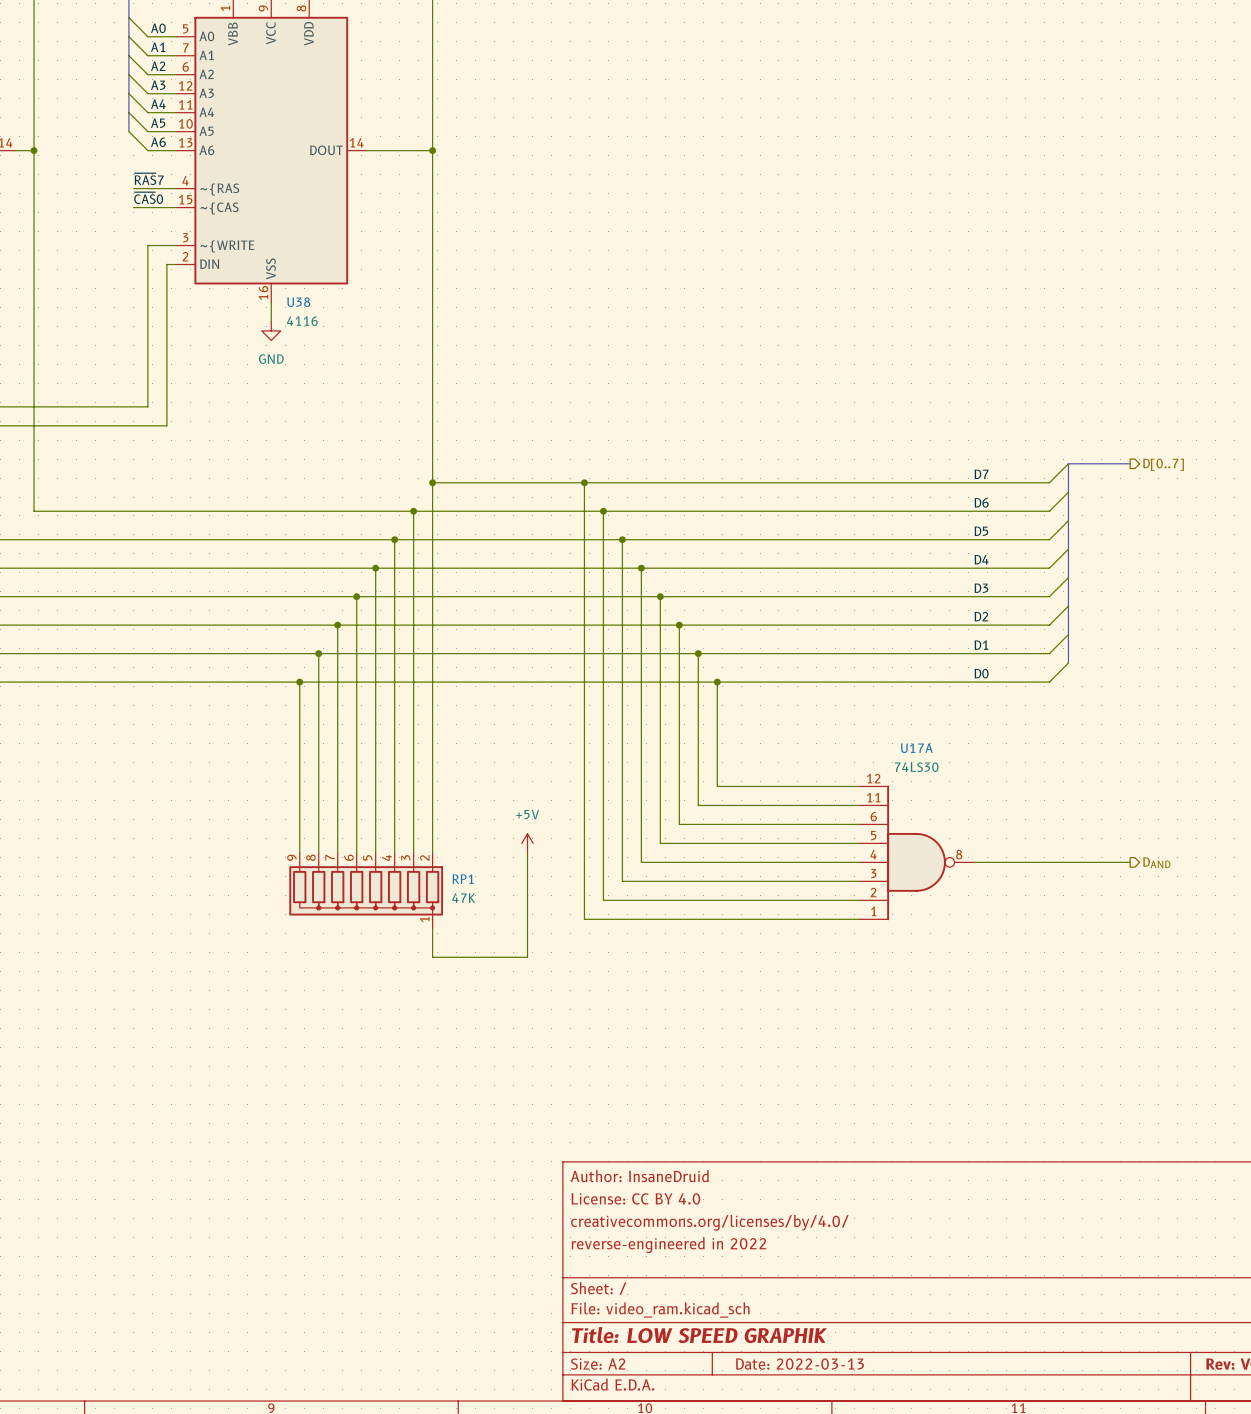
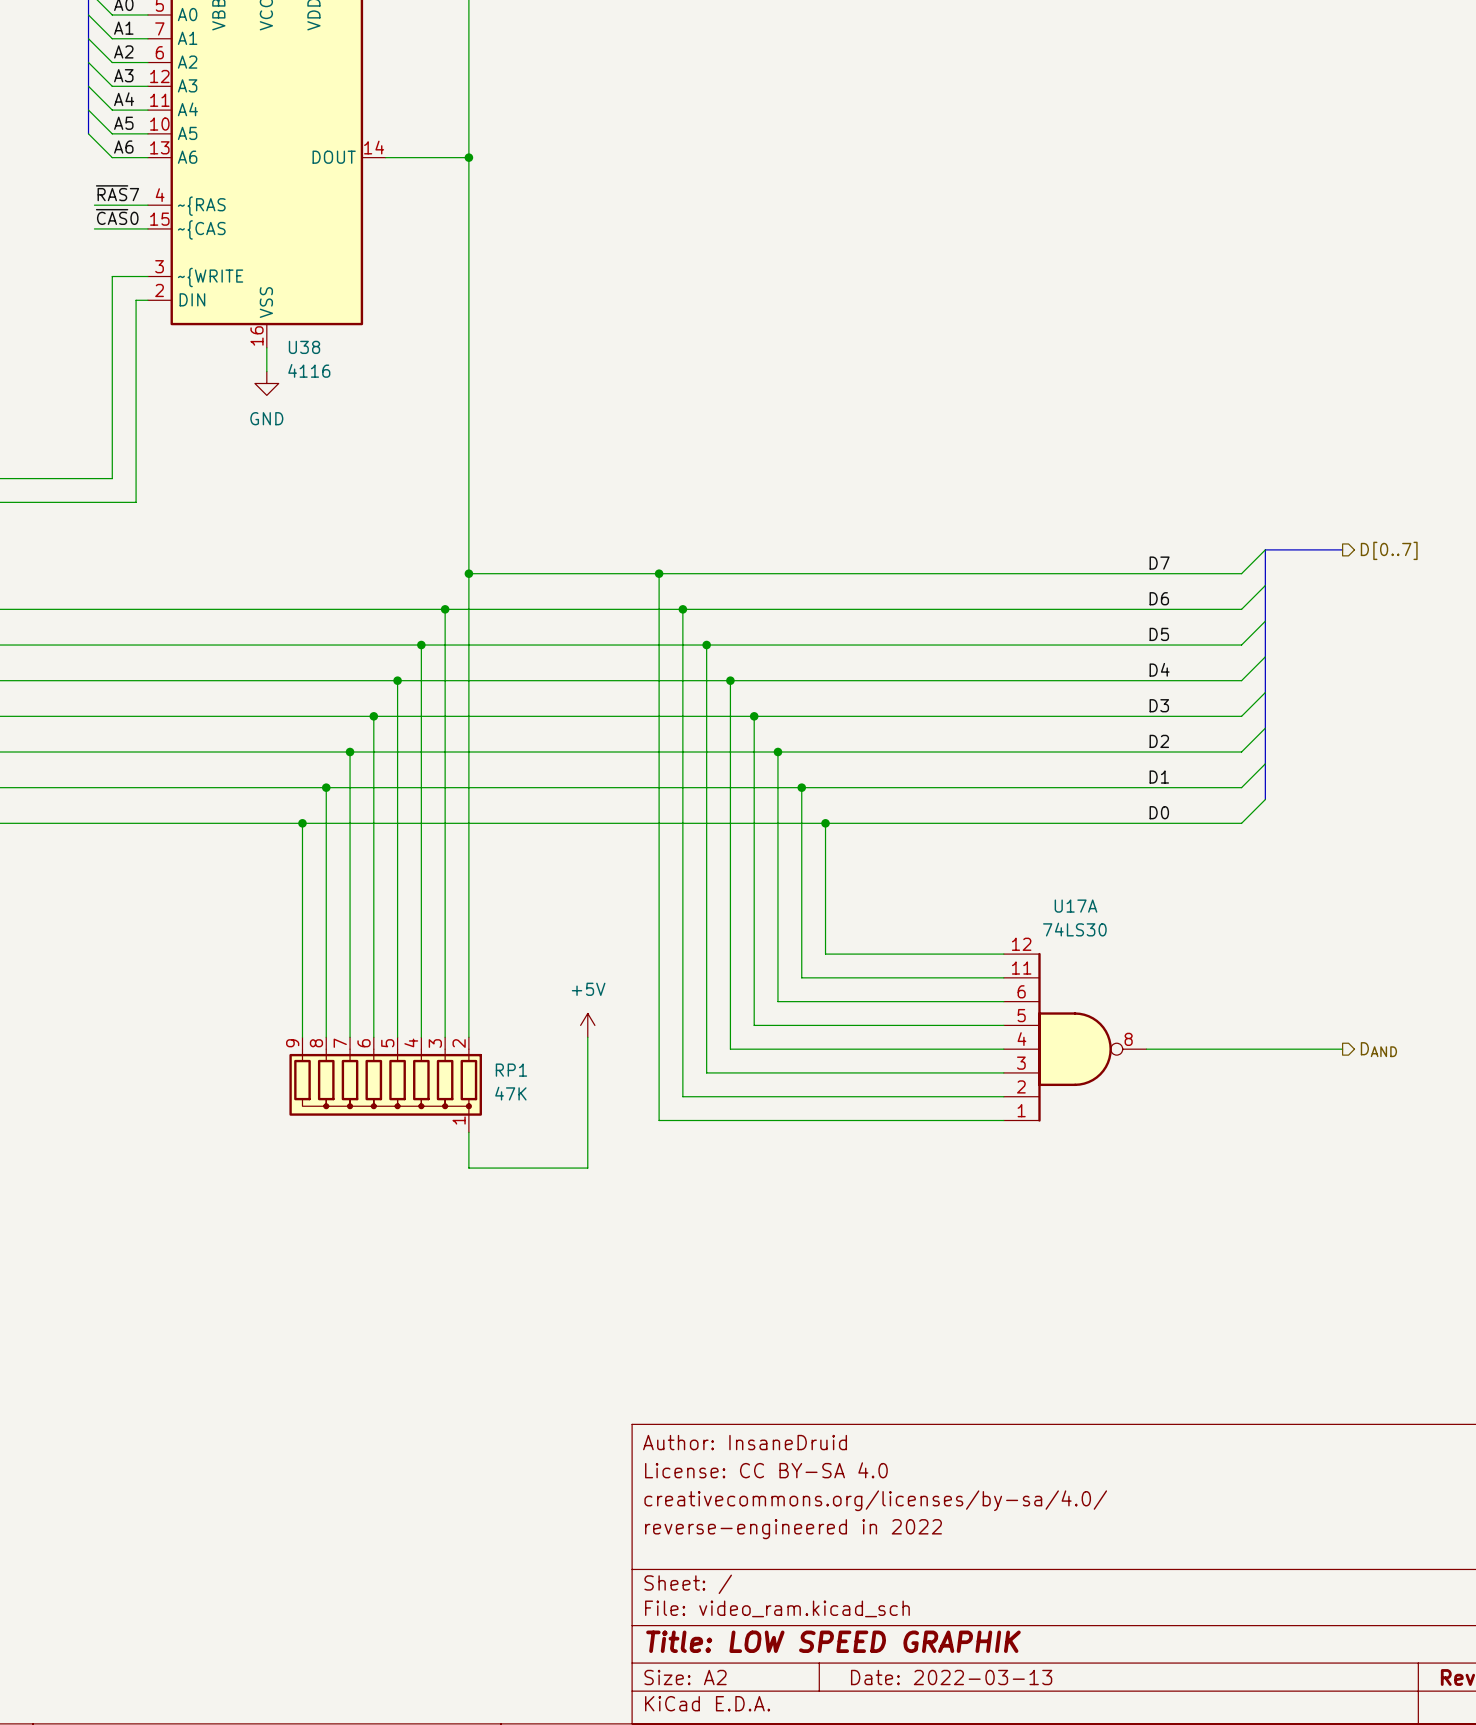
title block: License: CC BY 4.0 (635, 1198) -> License: CC BY-SA 4.0 (766, 1470)
title block: creativecommons.org/licenses/by/4.0/ (709, 1222) -> creativecommons.org/licenses/by-sa/4.0/ (875, 1500)

